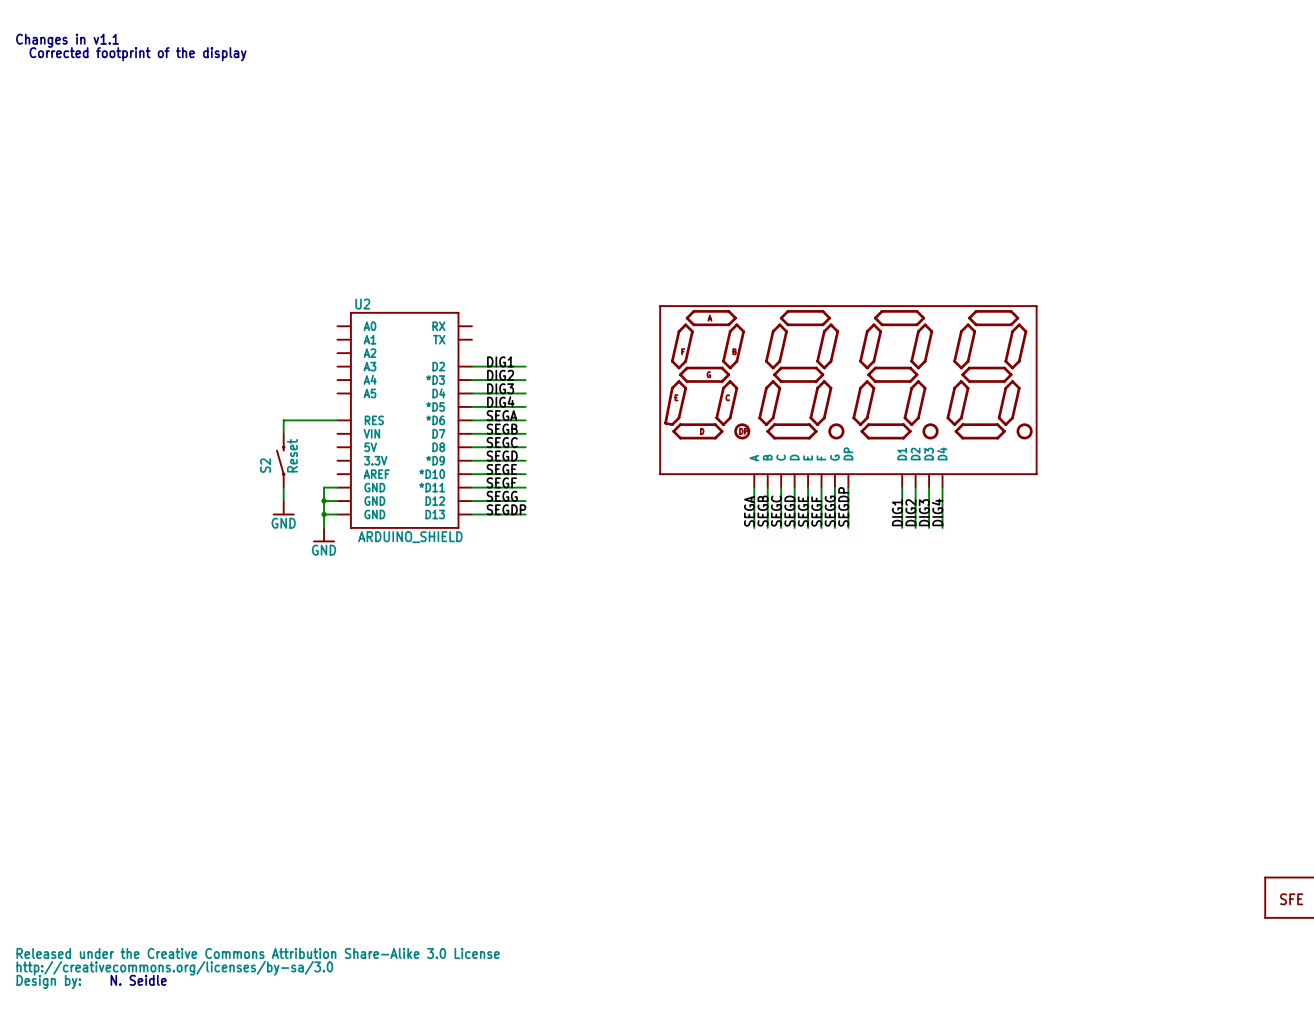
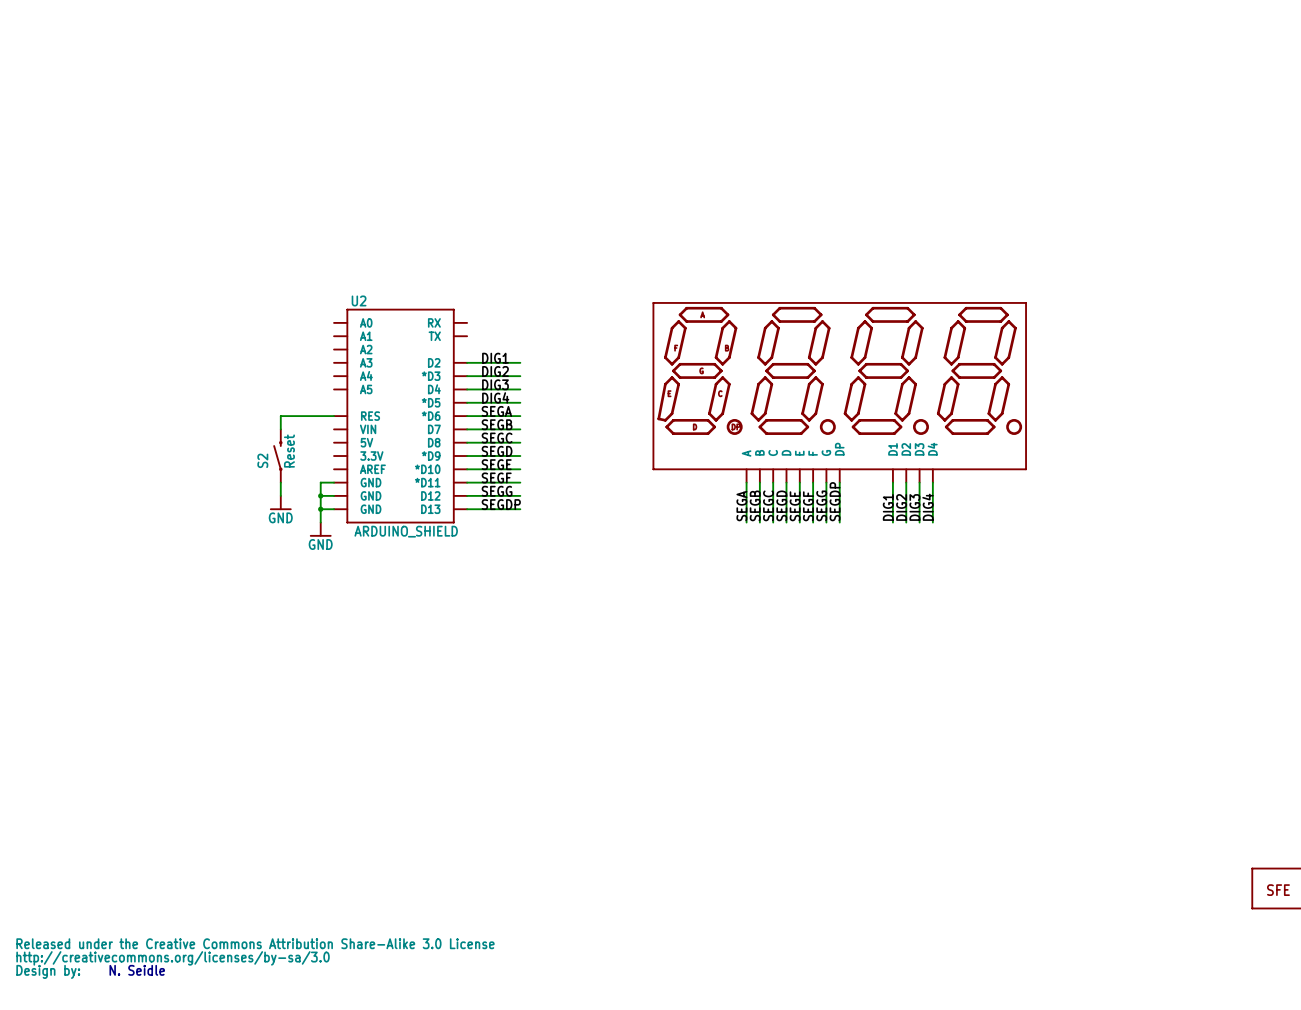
text: Changes in v1.1 (67, 40) -> none
text: Corrected footprint of the display (138, 54) -> none

